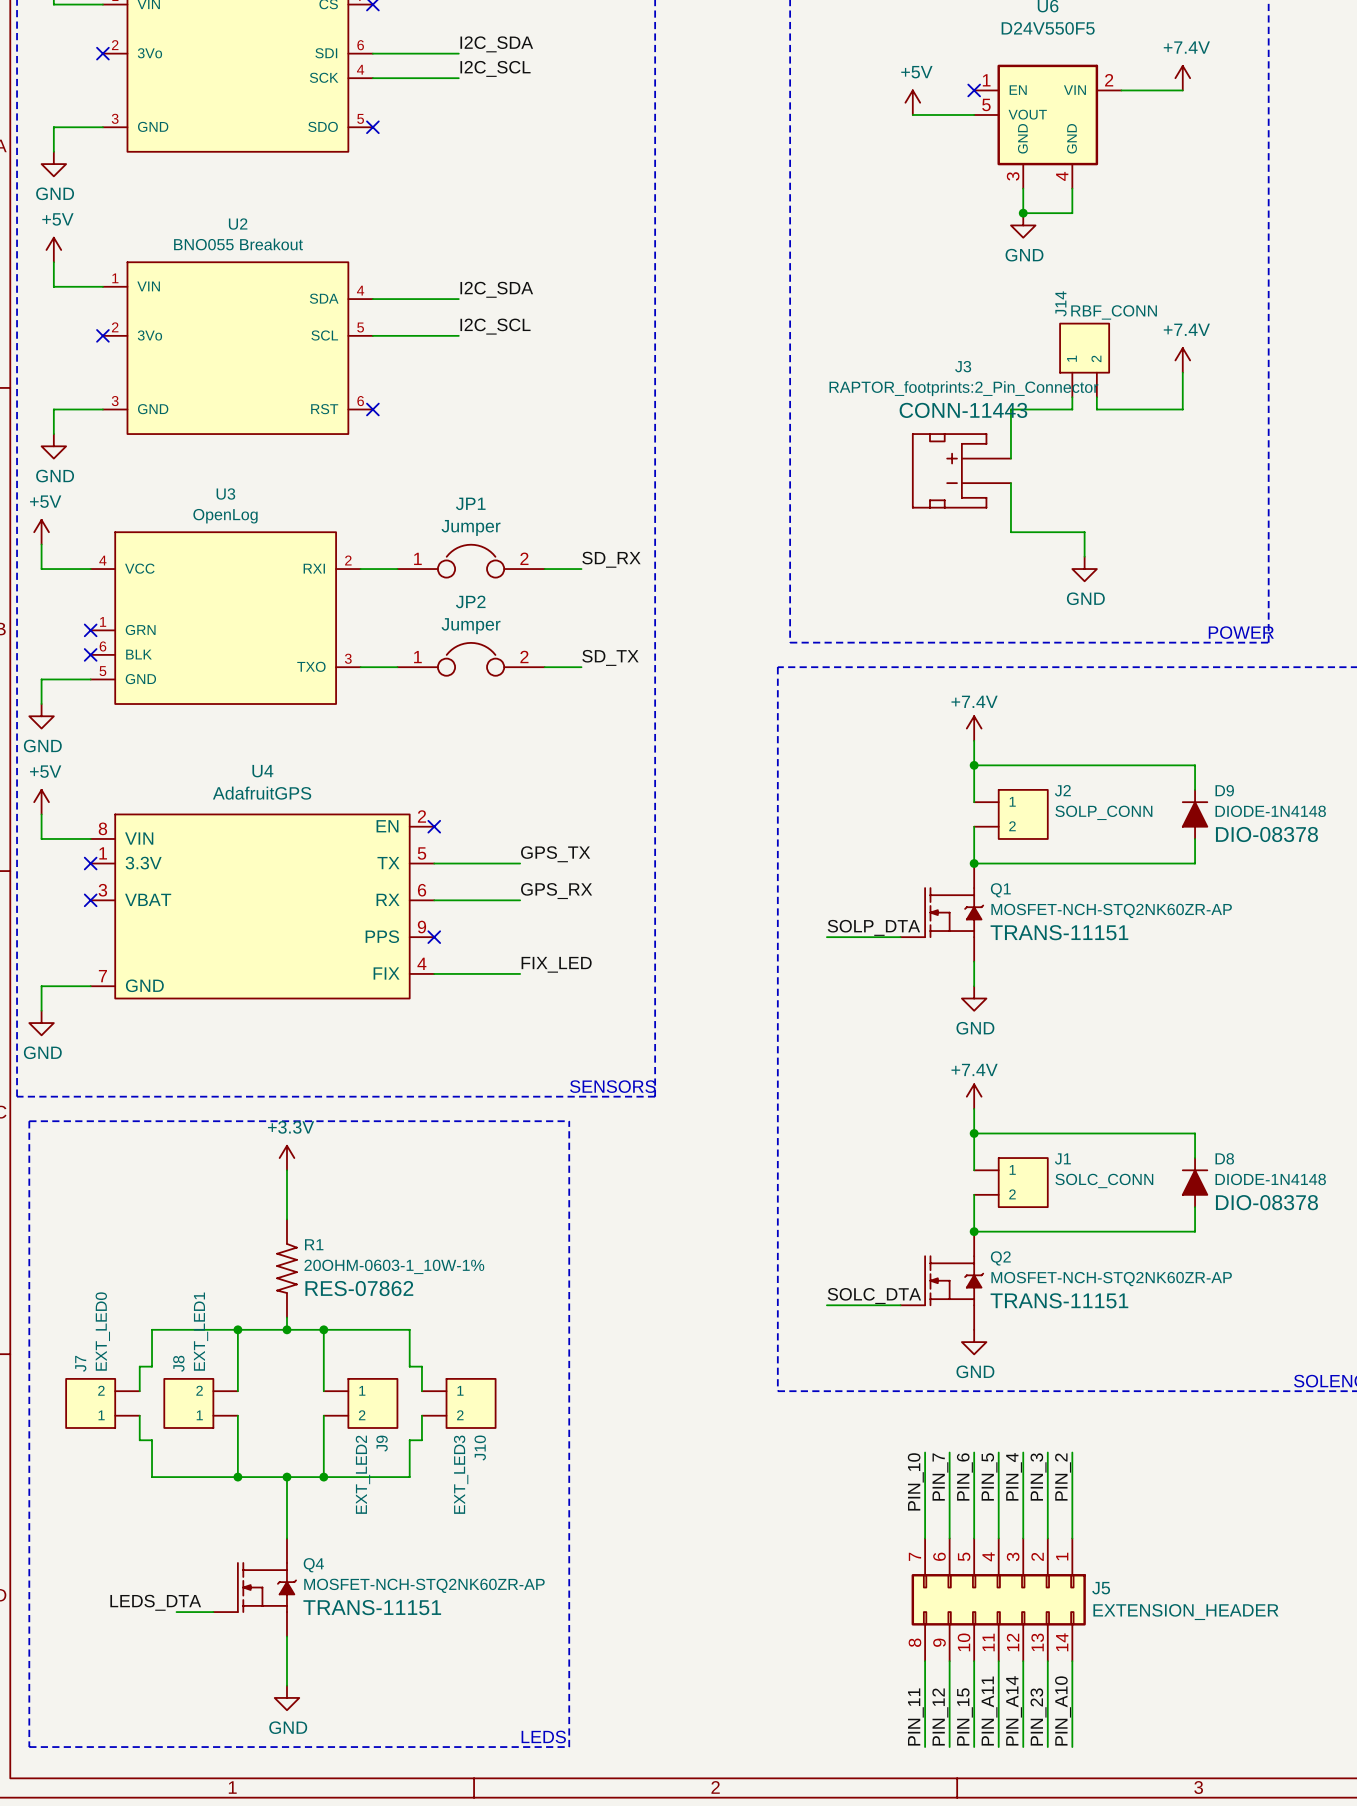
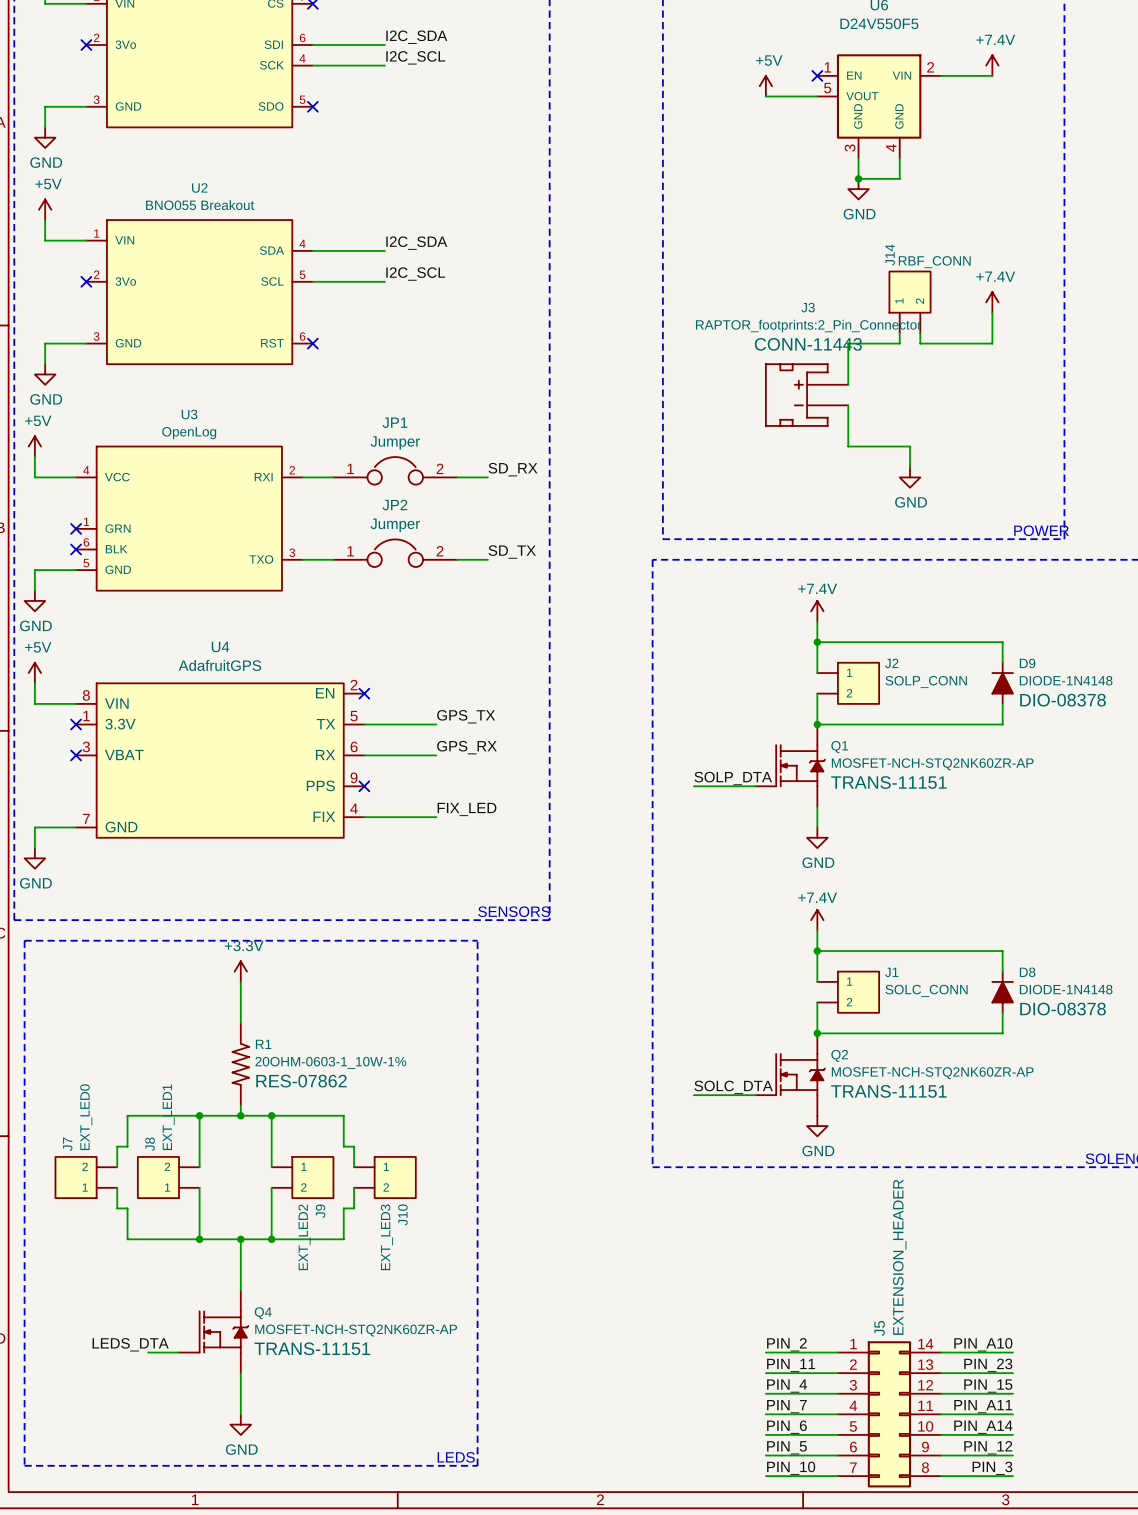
wire: (925, 1452) (925, 1538) -> none
wire: (949, 1452) (949, 1538) -> none
wire: (974, 1452) (974, 1538) -> none
wire: (998, 1452) (998, 1538) -> none
wire: (1023, 1452) (1023, 1538) -> none
wire: (1047, 1452) (1047, 1538) -> none
wire: (1072, 1452) (1072, 1538) -> none
label: PIN_6 (964, 1476) -> none
label: PIN_5 (989, 1476) -> none
label rotation: 0° (1014, 1476) -> 90° clockwise (787, 1386)
label position: PIN_4 (1014, 1476) -> PIN_4 (787, 1386)
label: PIN_3 (1038, 1476) -> none
label rotation: 0° (940, 1477) -> 90° clockwise (786, 1406)
label position: PIN_7 (940, 1477) -> PIN_7 (786, 1406)
label rotation: 0° (1063, 1477) -> 90° clockwise (786, 1344)
label position: PIN_2 (1063, 1477) -> PIN_2 (786, 1344)
label: PIN_10 (915, 1481) -> none
J5 rotation: 0° (998, 1599) -> 90° counterclockwise (889, 1414)
J5 position: (998, 1599) -> (889, 1414)
wire: none -> (940, 1352) (1012, 1352)
wire: none -> (765, 1373) (837, 1373)
wire: none -> (940, 1373) (1012, 1373)
label: none -> PIN_15 (988, 1386)
wire: (925, 1661) (925, 1747) -> none
wire: (949, 1661) (949, 1747) -> none
wire: (974, 1661) (974, 1747) -> none
wire: (998, 1661) (998, 1747) -> (837, 1393) (765, 1393)
wire: (1023, 1661) (1023, 1747) -> none
wire: none -> (940, 1393) (1012, 1393)
wire: none -> (765, 1414) (837, 1414)
wire: none -> (940, 1414) (1012, 1414)
label: none -> PIN_6 (786, 1427)
wire: none -> (765, 1434) (837, 1434)
label rotation: 0° (1014, 1710) -> 90° clockwise (983, 1427)
label position: PIN_A14 (1014, 1710) -> PIN_A14 (983, 1427)
label rotation: 0° (1063, 1710) -> 90° clockwise (983, 1344)
label position: PIN_A10 (1063, 1710) -> PIN_A10 (983, 1344)
wire: none -> (940, 1434) (1012, 1434)
label rotation: 0° (989, 1711) -> 90° clockwise (983, 1406)
label position: PIN_A11 (989, 1711) -> PIN_A11 (983, 1406)
label: PIN_15 (964, 1716) -> none
label rotation: 0° (1038, 1716) -> 90° clockwise (988, 1365)
label position: PIN_23 (1038, 1716) -> PIN_23 (988, 1365)
label rotation: 0° (915, 1717) -> 90° clockwise (791, 1365)
label position: PIN_11 (915, 1717) -> PIN_11 (791, 1365)
label: PIN_12 (940, 1717) -> none
label: none -> PIN_5 (786, 1447)
label: none -> PIN_12 (988, 1447)
wire: none -> (765, 1455) (837, 1455)
wire: none -> (940, 1455) (1012, 1455)
label: none -> PIN_10 (791, 1468)
label: none -> PIN_3 (992, 1468)
wire: none -> (765, 1476) (837, 1476)
wire: none -> (940, 1476) (1012, 1476)

